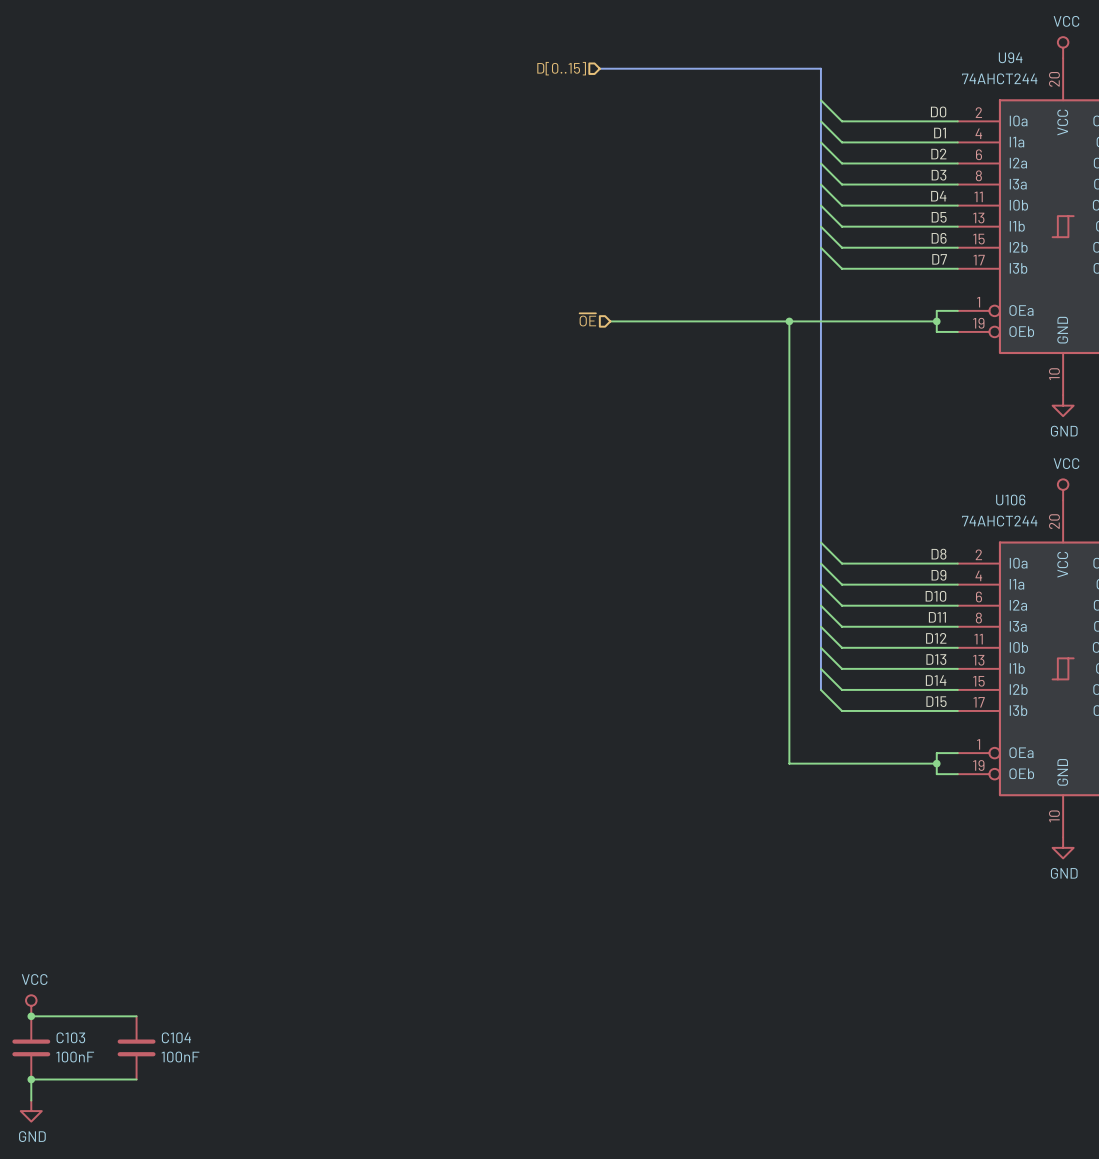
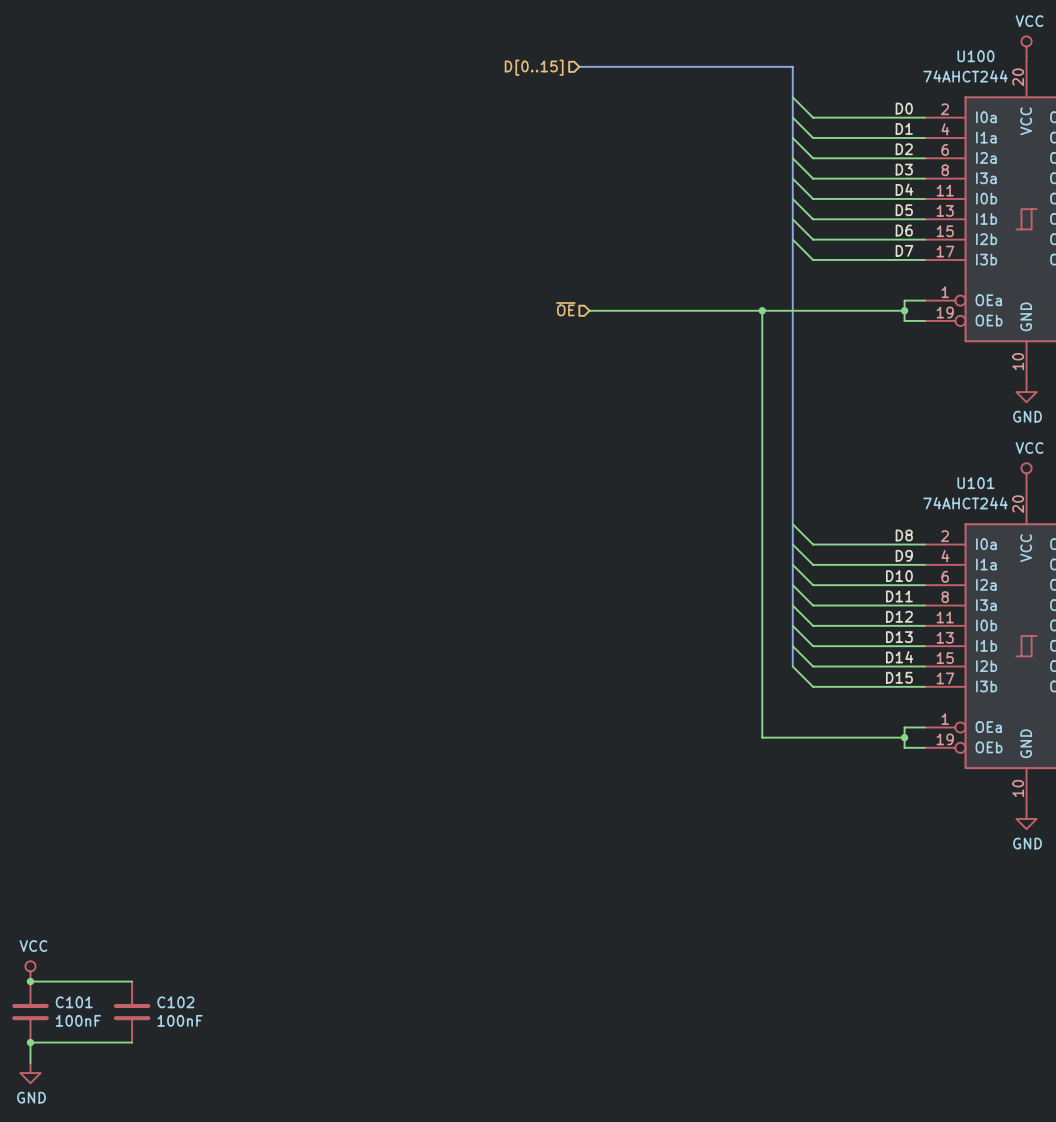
U94 name: U94 (1010, 57) -> U100 (975, 56)
U106 name: U106 (1010, 500) -> U101 (975, 483)
C103 name: C103 (70, 1037) -> C101 (74, 1002)
C104 name: C104 (176, 1037) -> C102 (175, 1002)

